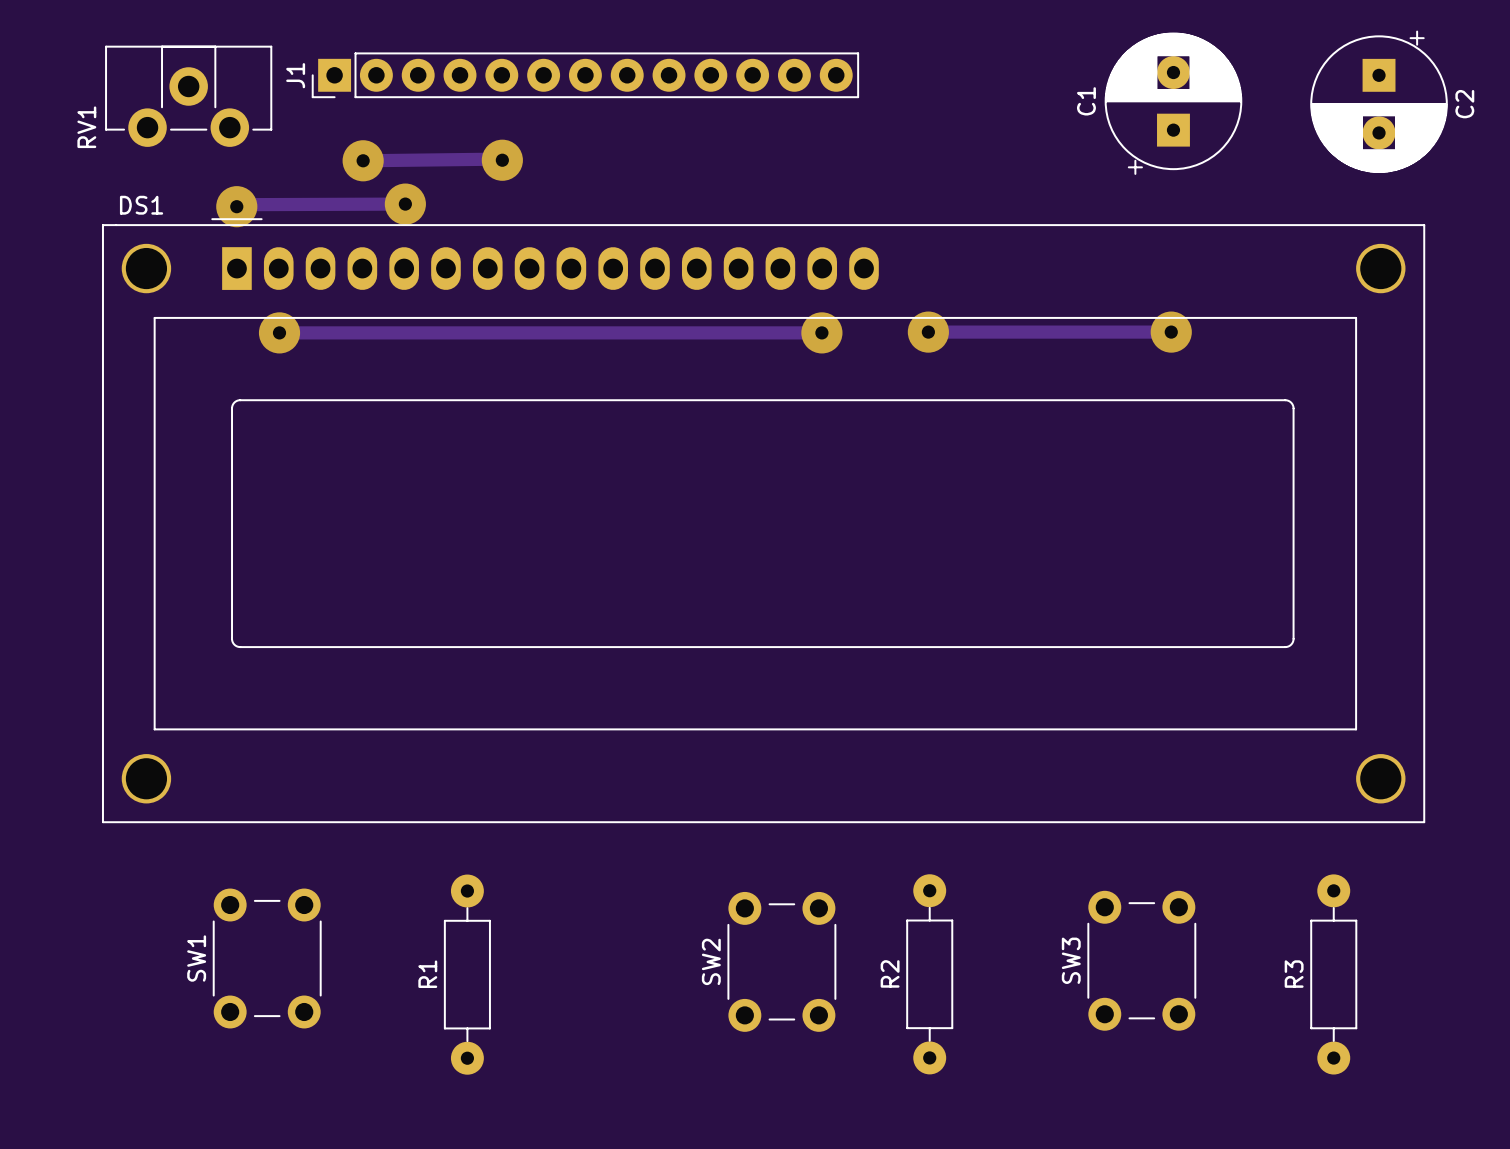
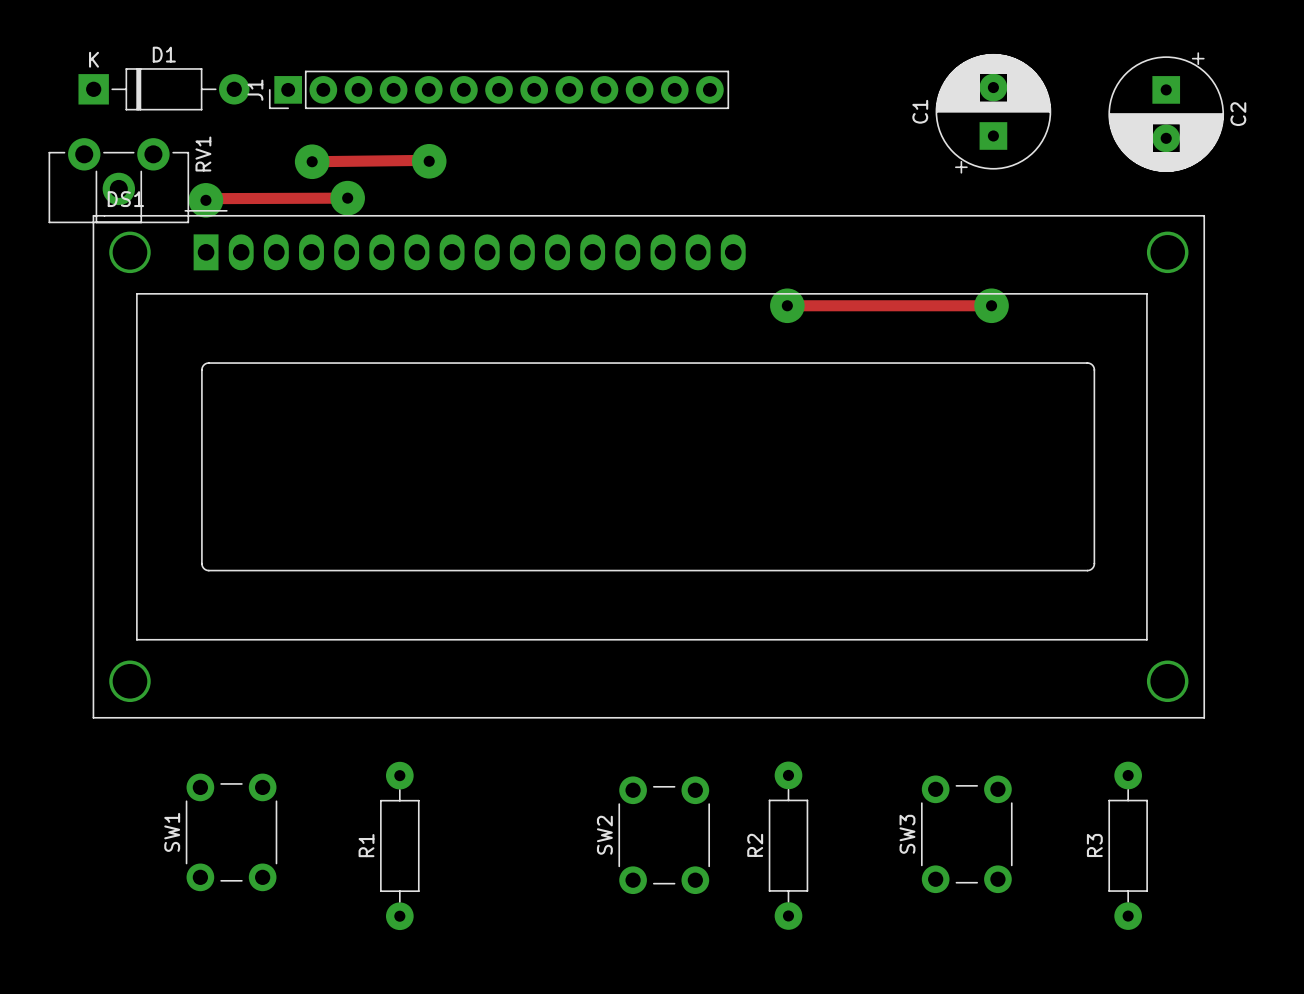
RV1 footprint: [105, 45, 273, 147] -> [48, 138, 190, 224]
D1: none -> (163, 89)
RV1 name position: RV1 (86, 127) -> RV1 (203, 154)
track: (279, 332) (821, 332) -> none
via: (279, 332) -> none
via: (821, 332) -> none

